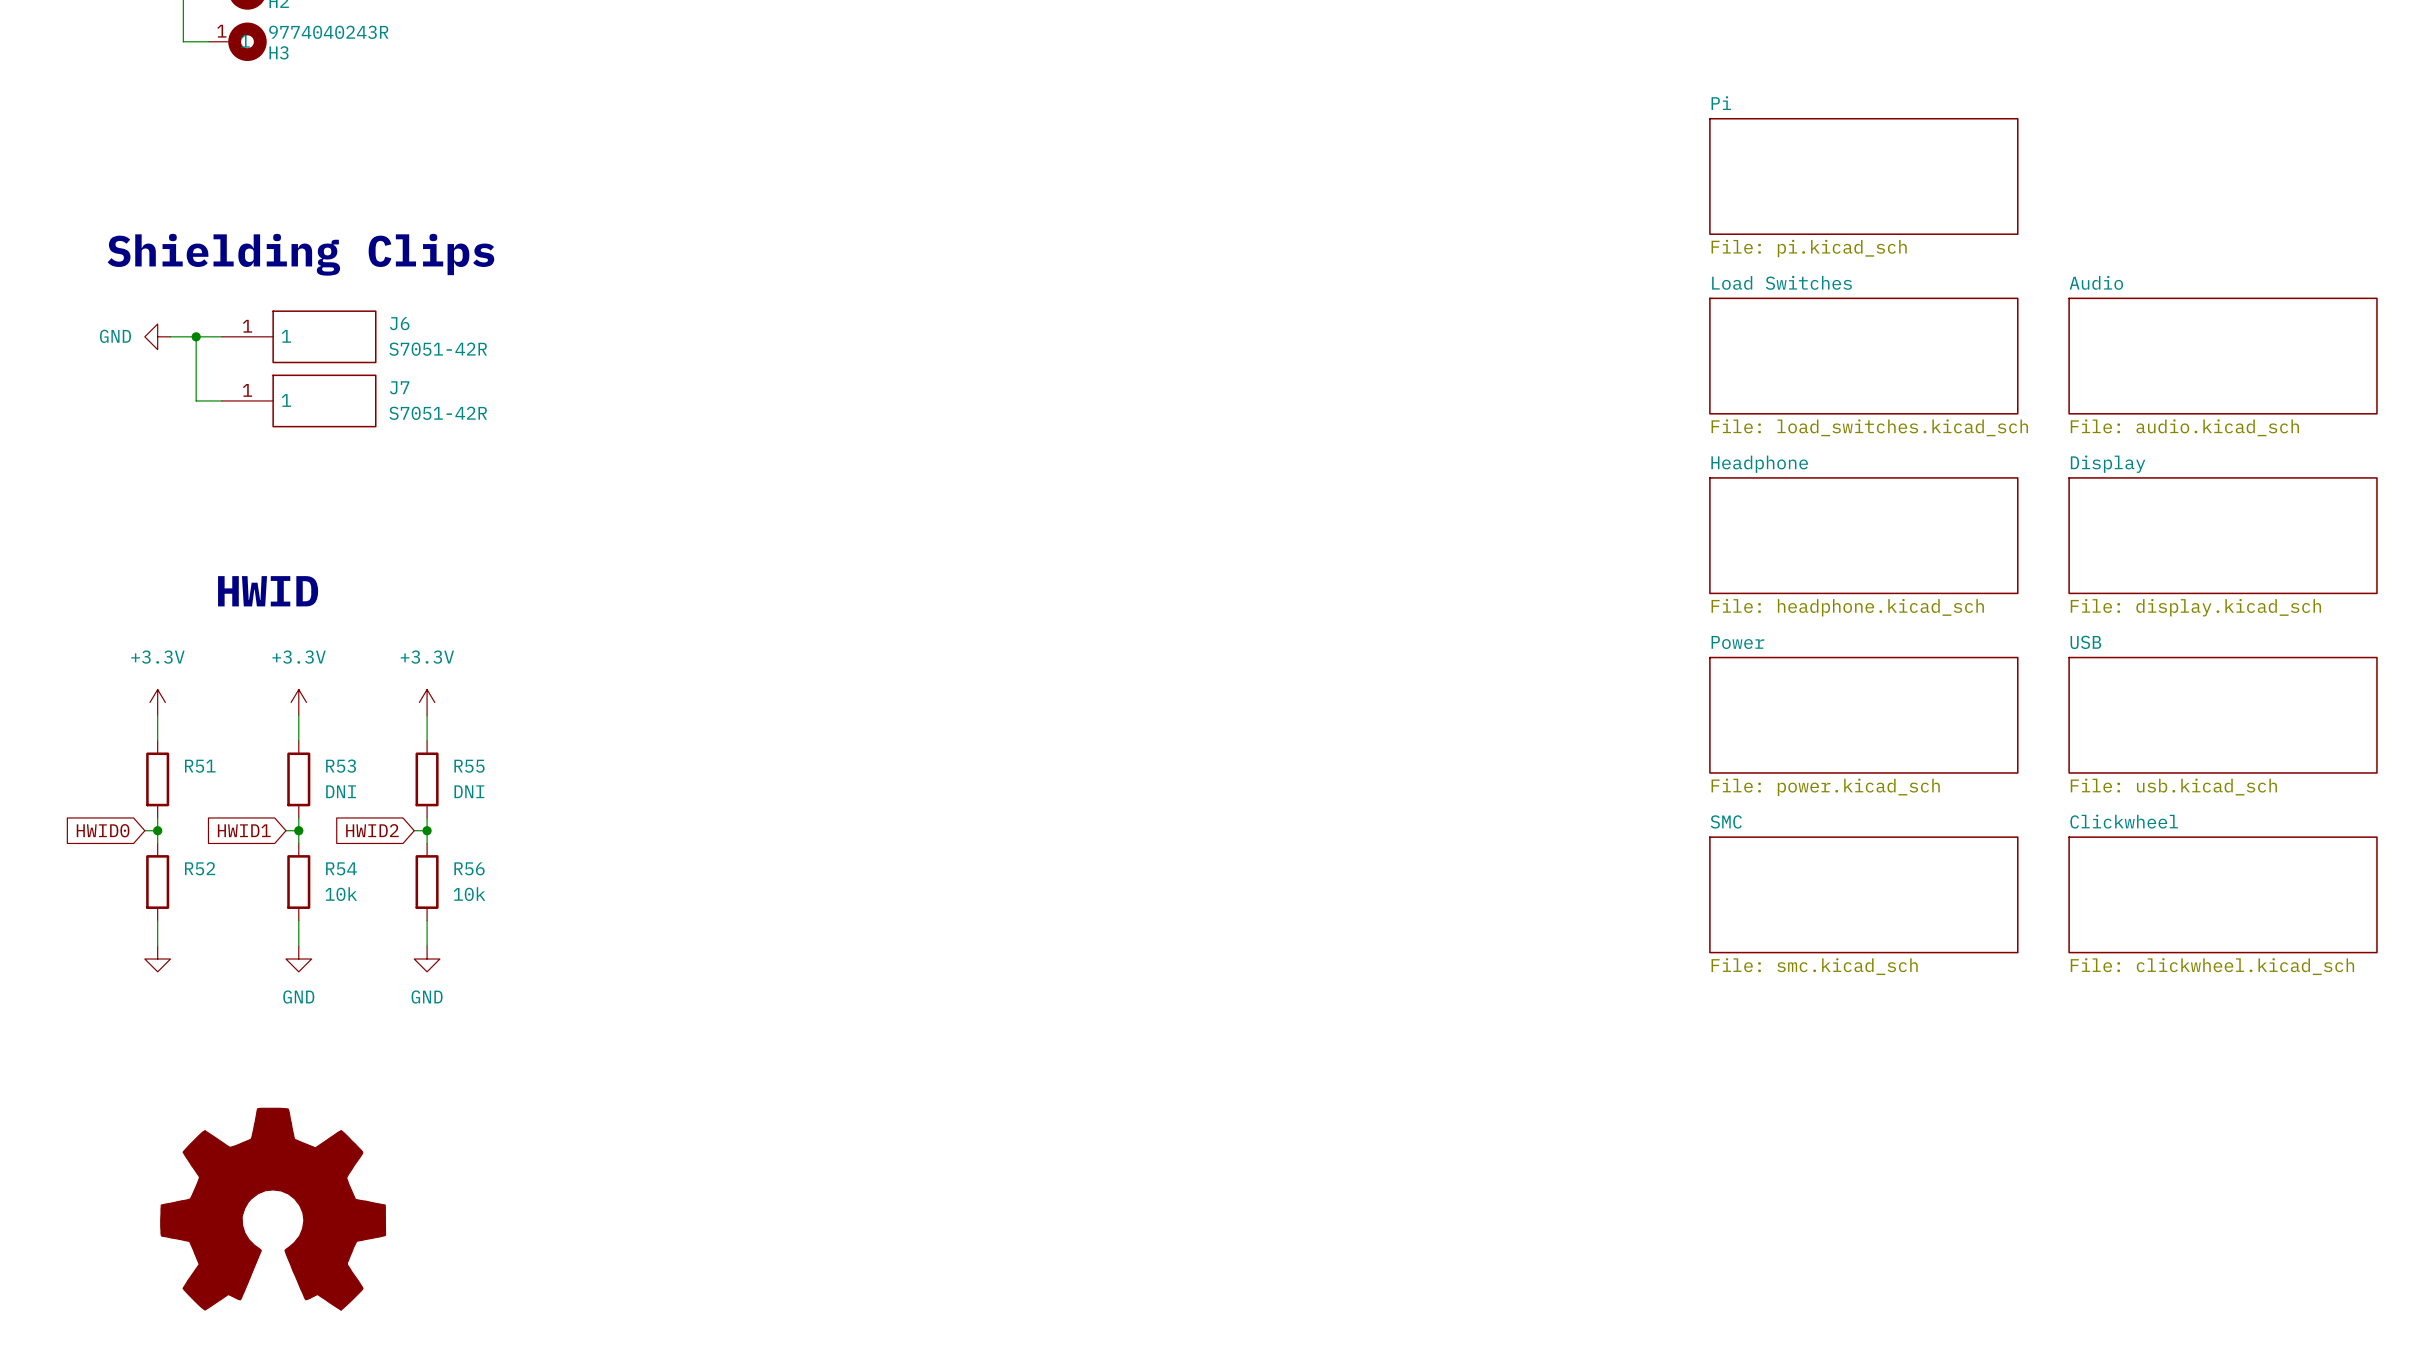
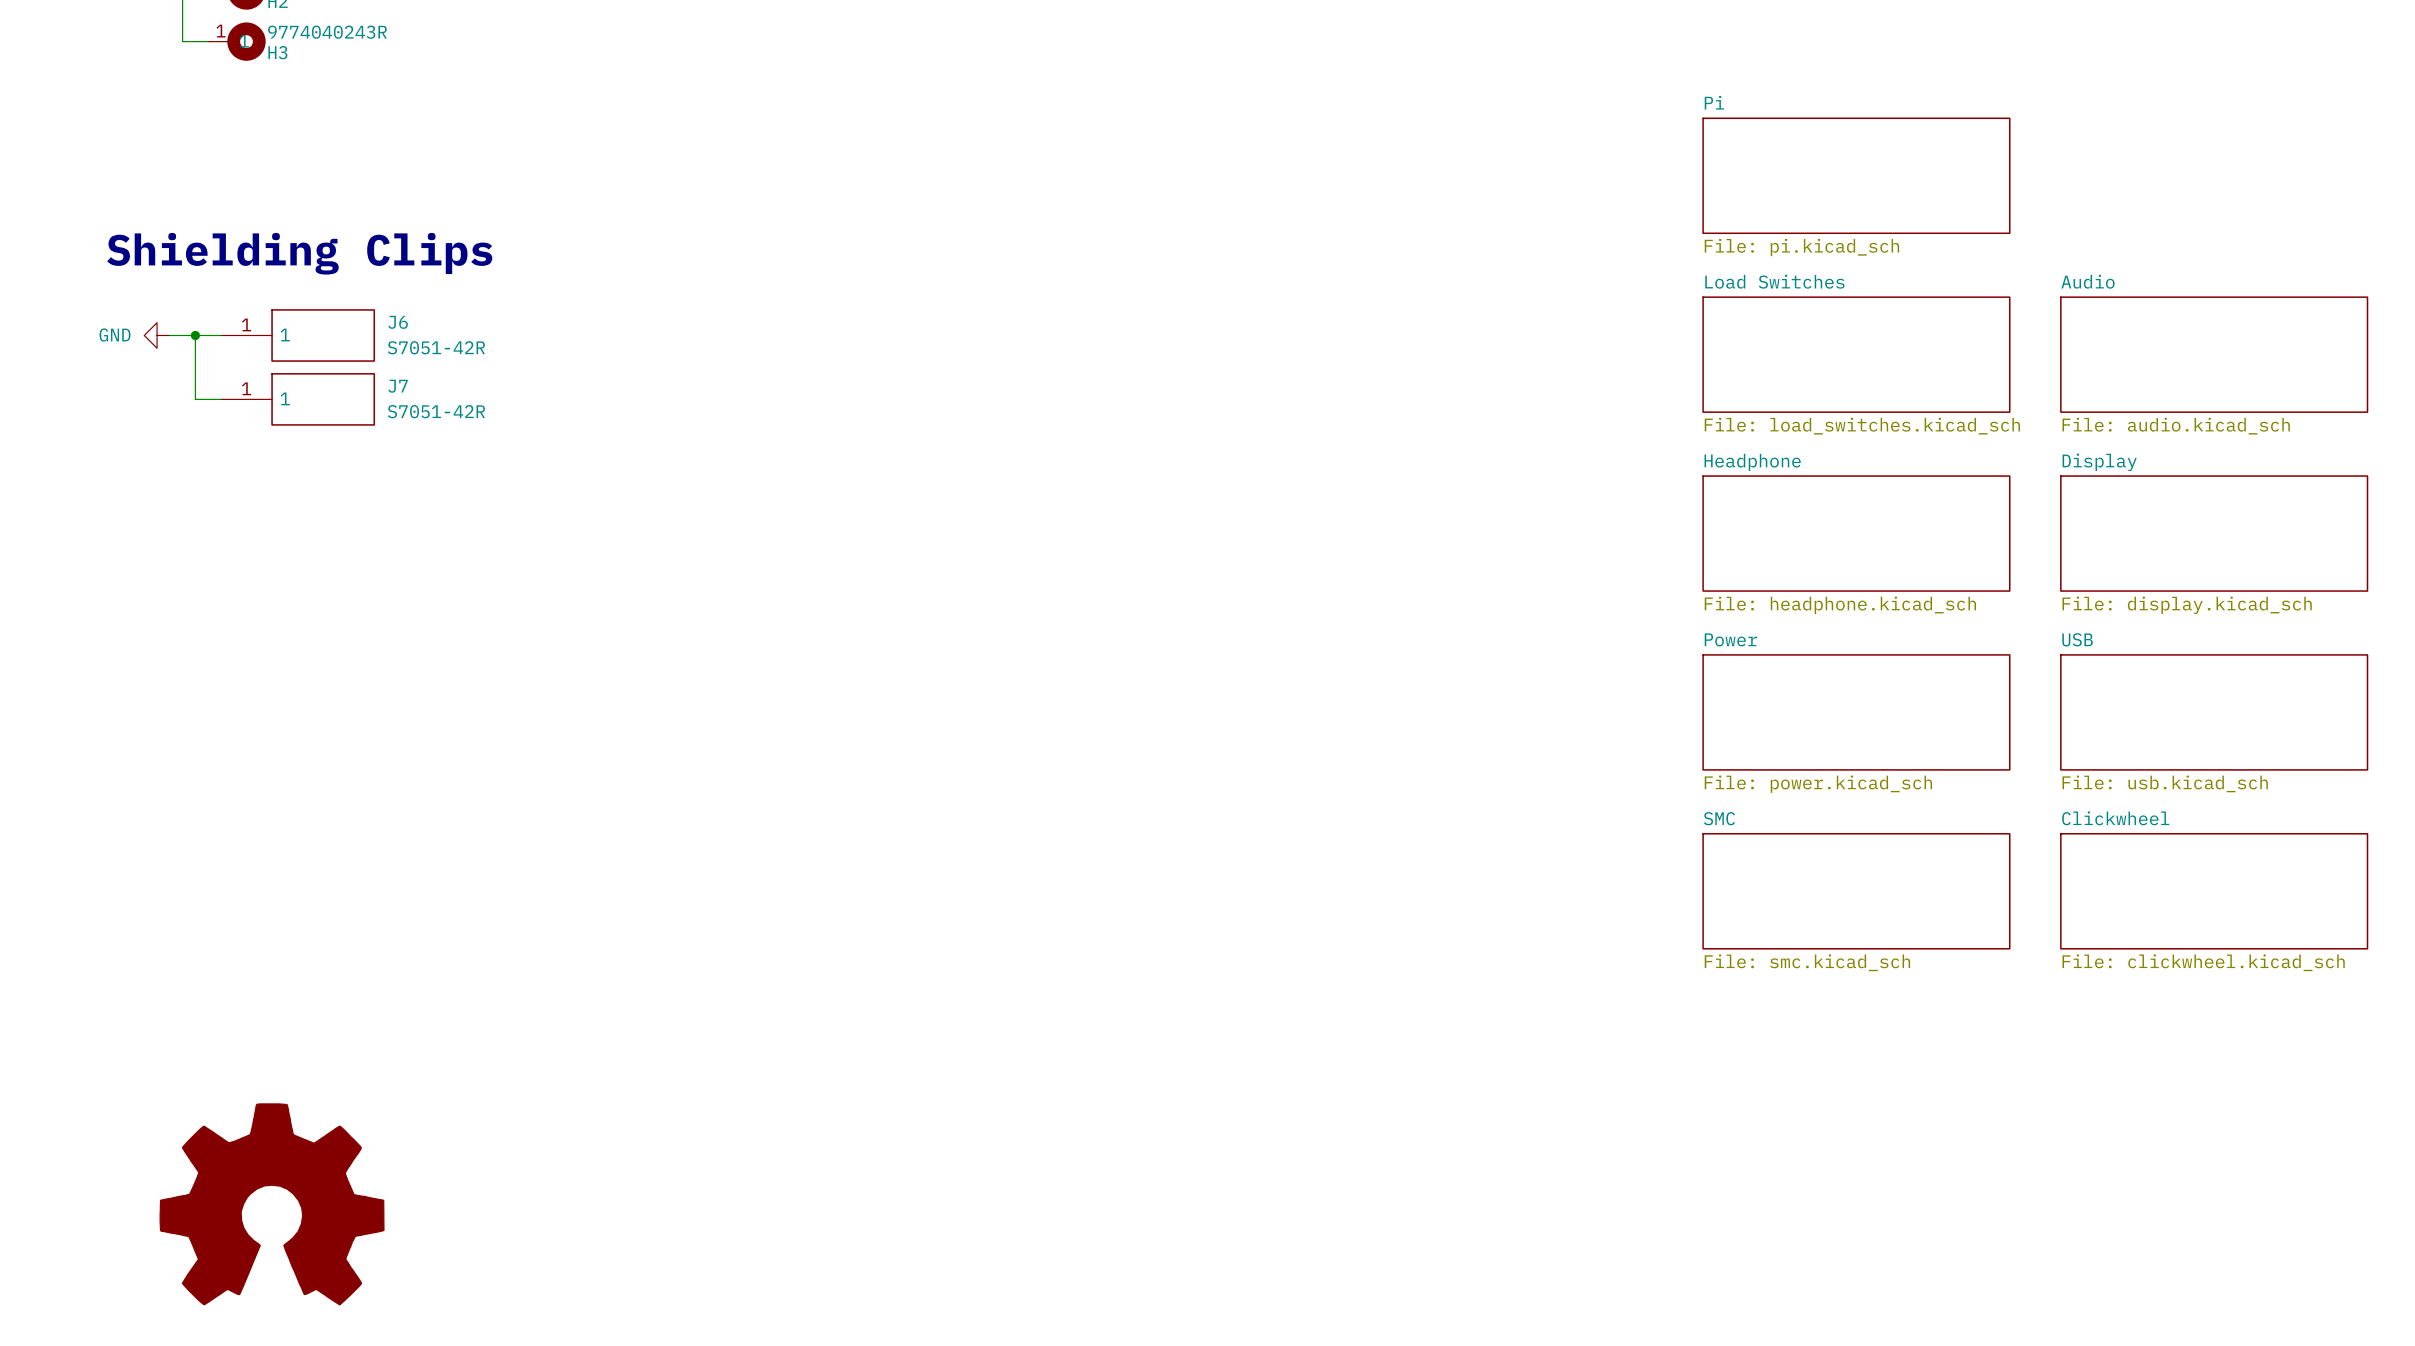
text: HWID (268, 591) -> none
power symbol: +3.3V (157, 702) -> none
power symbol: +3.3V (298, 702) -> none
power symbol: +3.3V (427, 702) -> none
wire: (157, 715) (157, 740) -> none
wire: (298, 715) (298, 740) -> none
wire: (427, 715) (427, 740) -> none
R51: (157, 779) -> none
R53: DNI (298, 779) -> none
R55: DNI (427, 779) -> none
wire: (157, 817) (157, 843) -> none
wire: (298, 817) (298, 843) -> none
wire: (427, 817) (427, 843) -> none
global label: HWID0 (103, 830) -> none
wire: (144, 830) (157, 830) -> none
junction: (157, 830) -> none
global label: HWID1 (244, 830) -> none
wire: (285, 830) (298, 830) -> none
junction: (298, 830) -> none
global label: HWID2 (372, 830) -> none
wire: (414, 830) (427, 830) -> none
junction: (427, 830) -> none
R52: (157, 882) -> none
R54: 10k (298, 882) -> none
R56: 10k (427, 882) -> none
wire: (157, 920) (157, 946) -> none
wire: (298, 920) (298, 946) -> none
wire: (427, 920) (427, 946) -> none
power symbol: (157, 959) -> none
power symbol: GND (298, 959) -> none
power symbol: GND (427, 959) -> none

